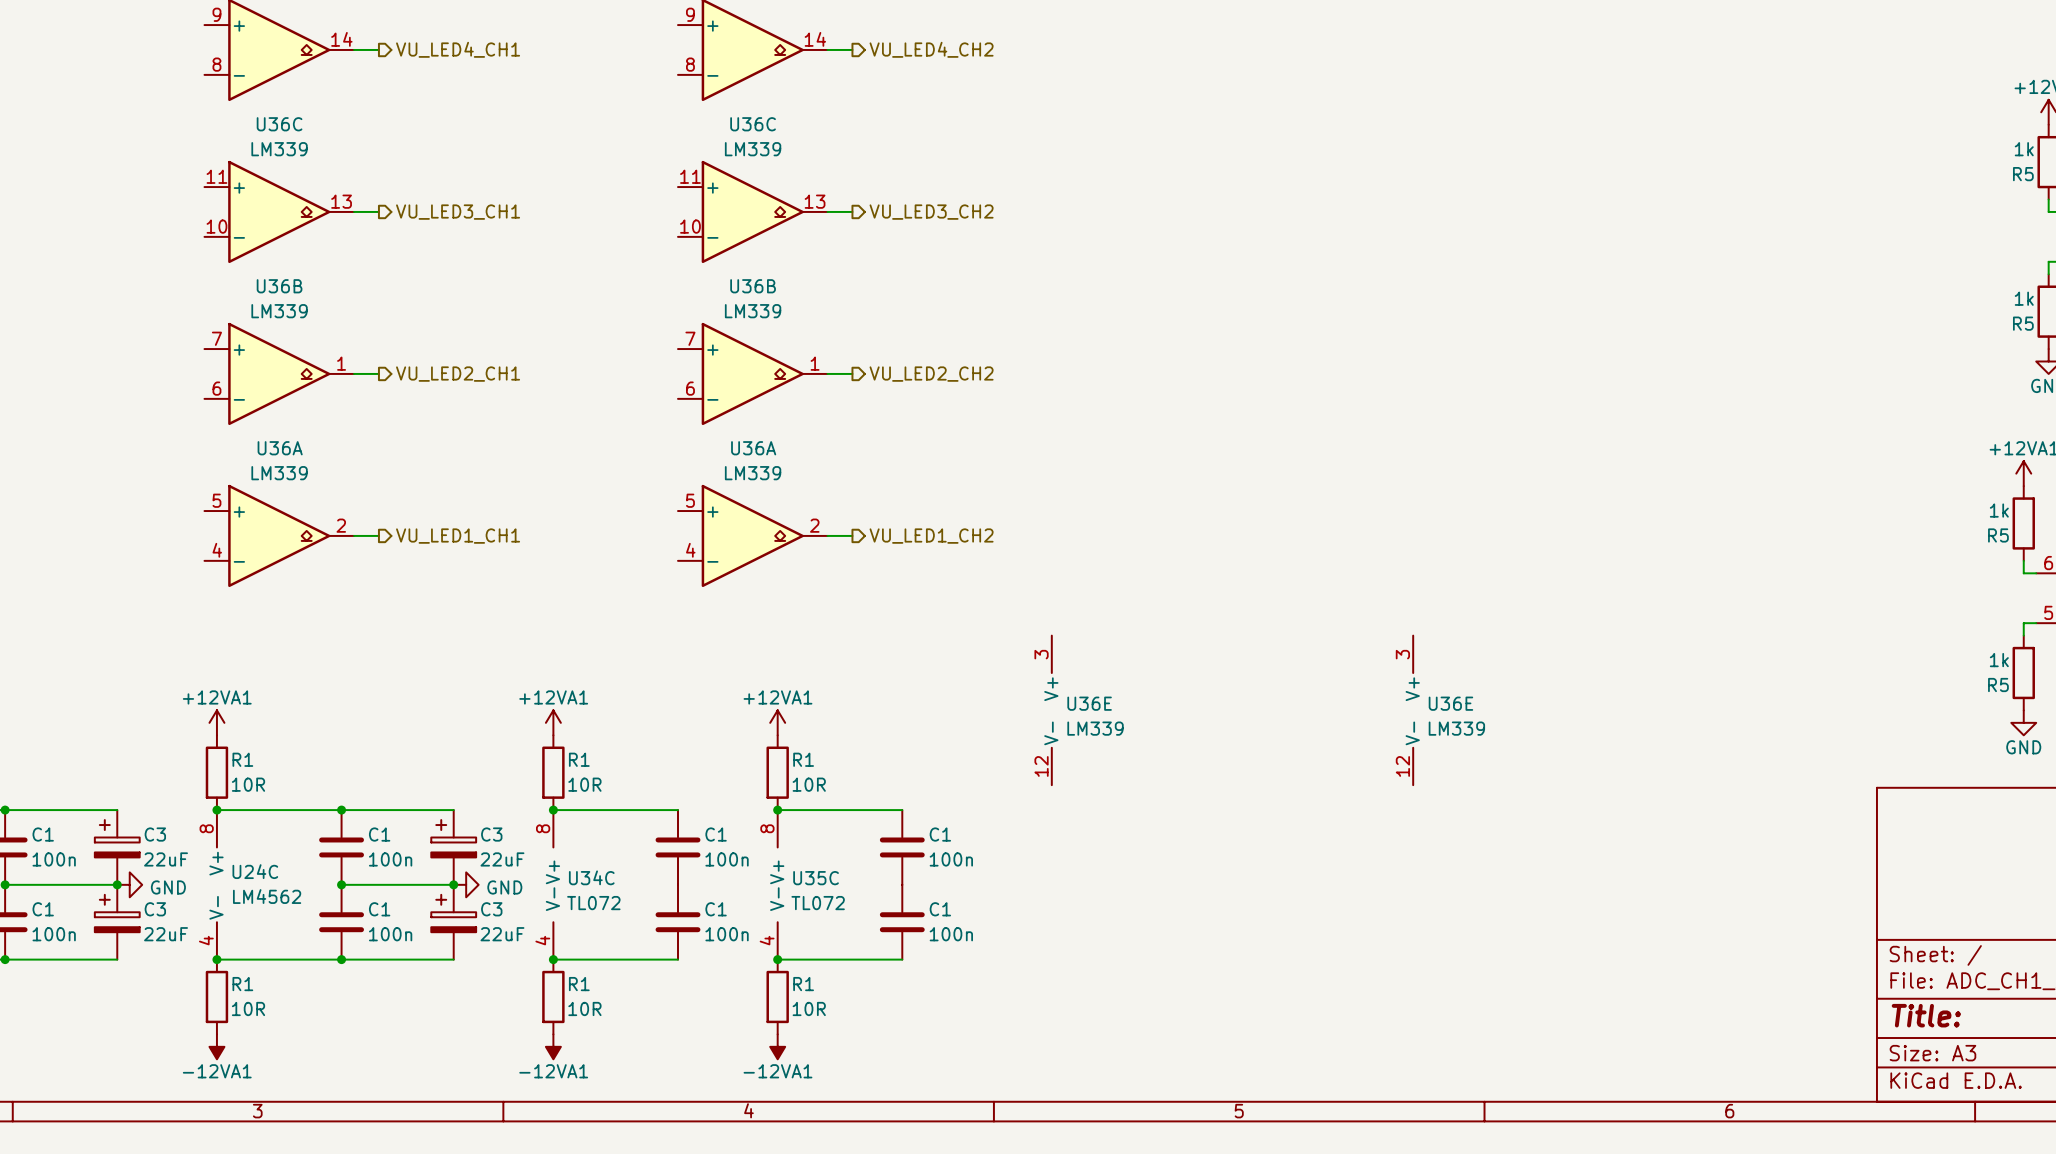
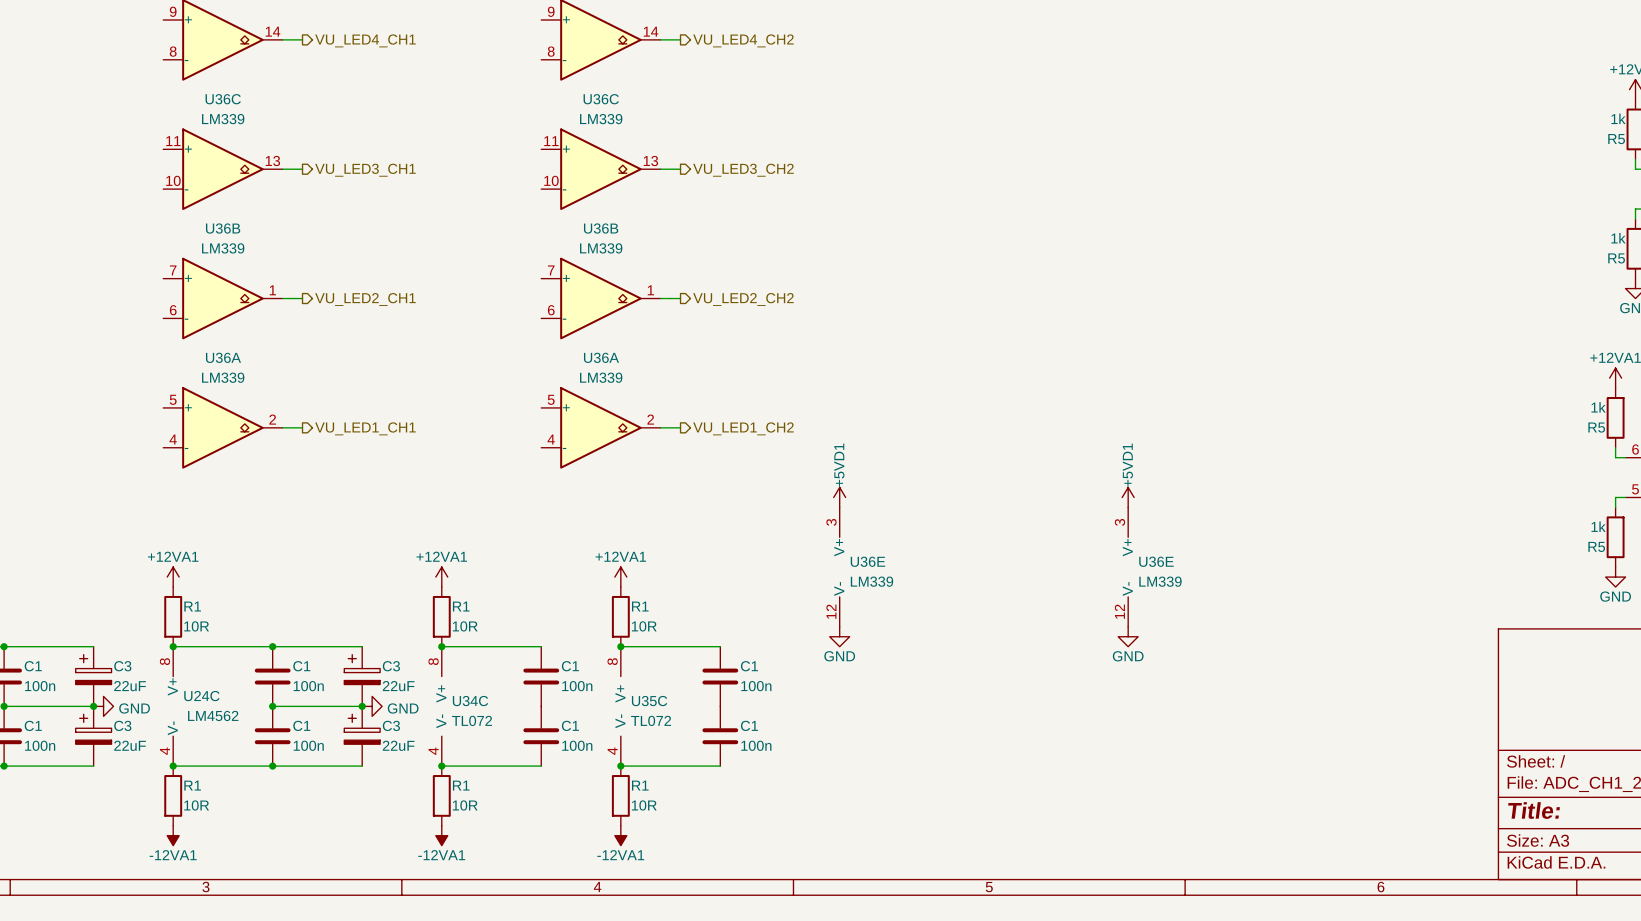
power symbol: none -> +5VD1 (839, 497)
power symbol: none -> +5VD1 (1128, 497)
power symbol: none -> GND (839, 636)
power symbol: none -> GND (1128, 636)

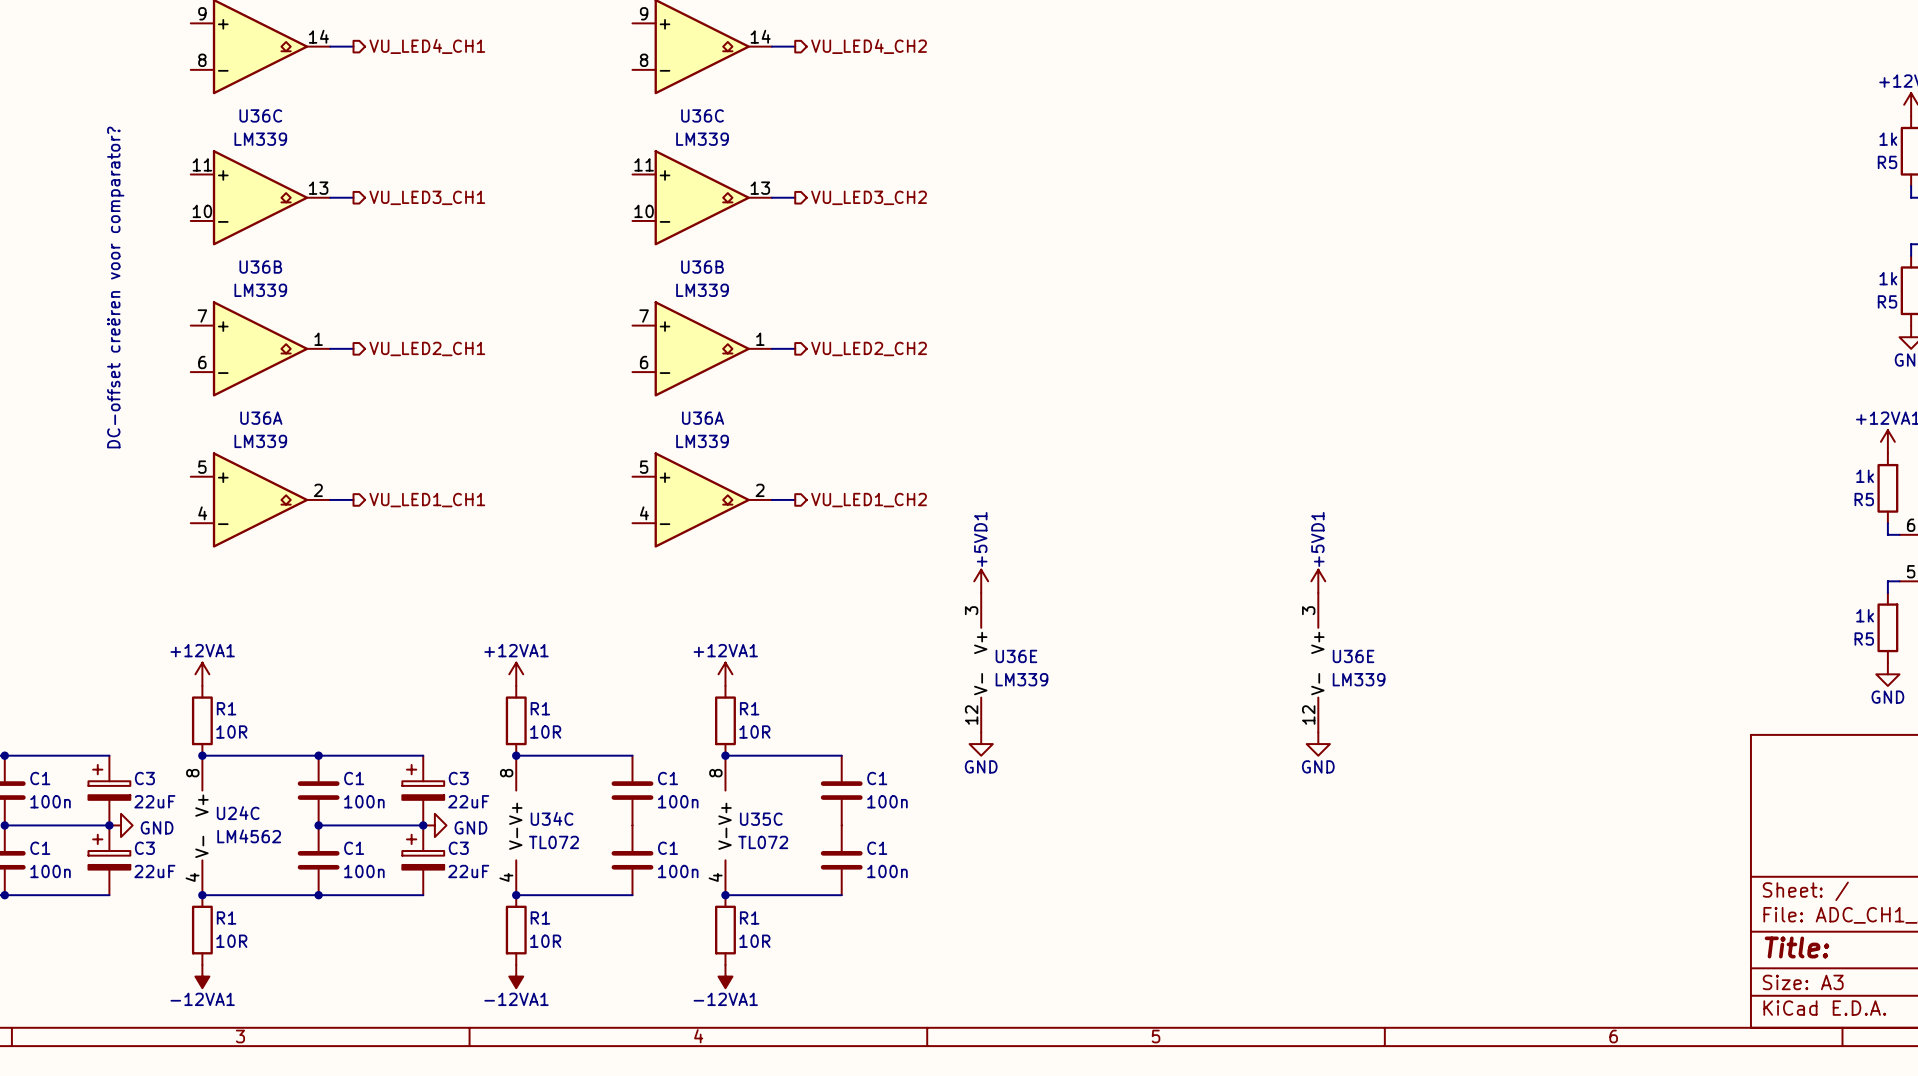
text: none -> DC-offset creëren voor comparator? (115, 287)

